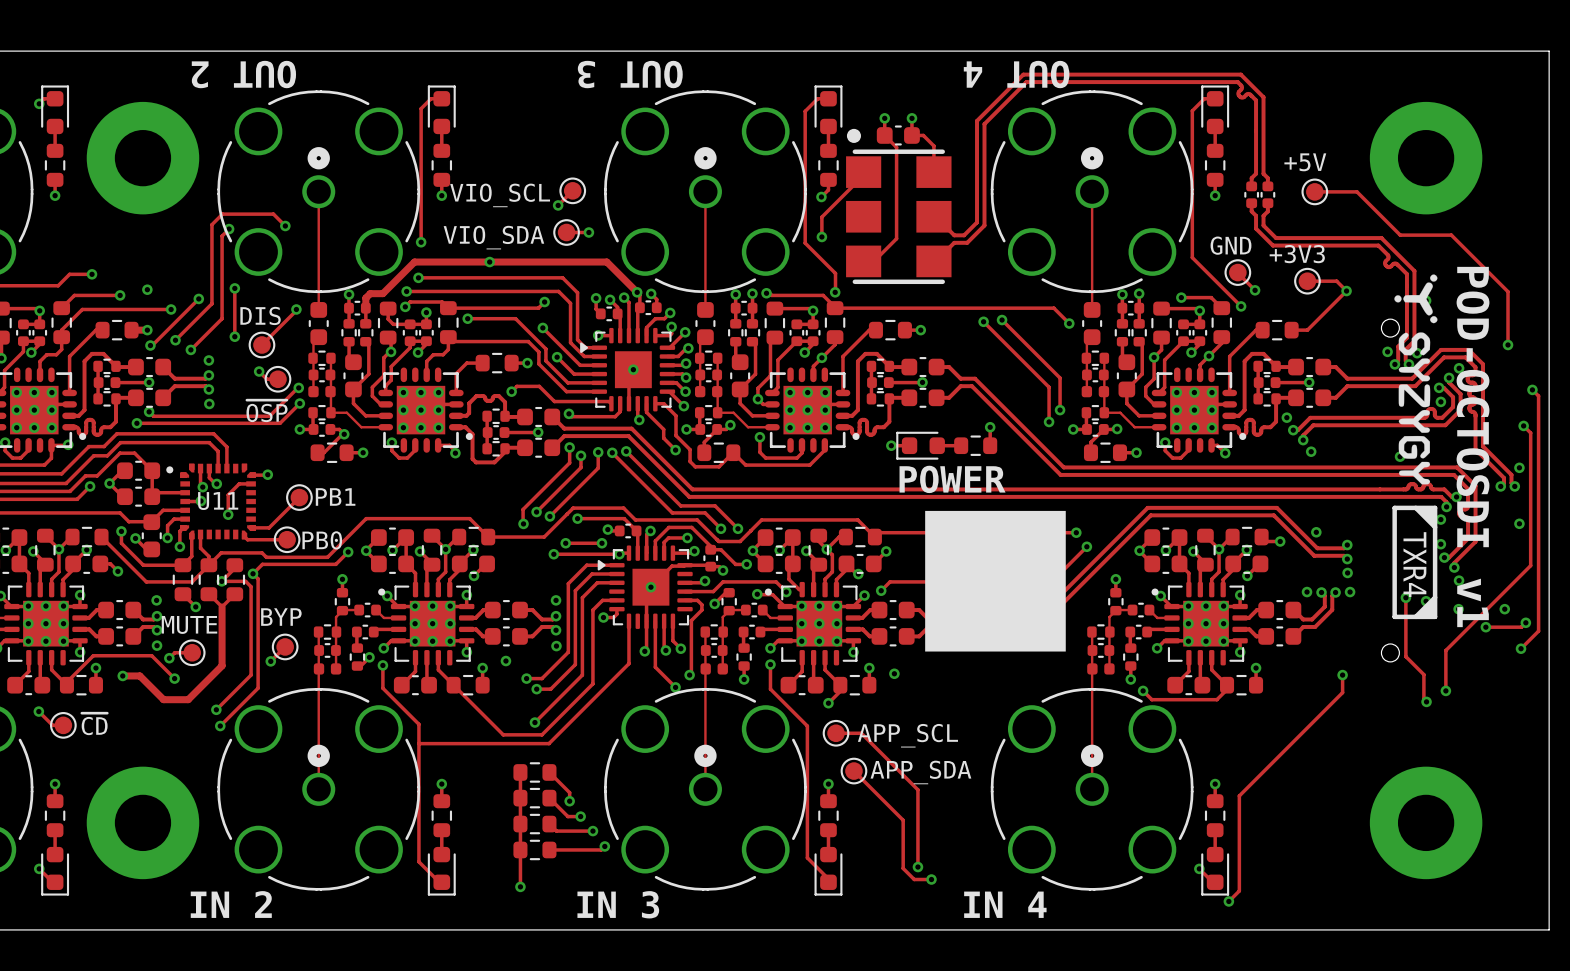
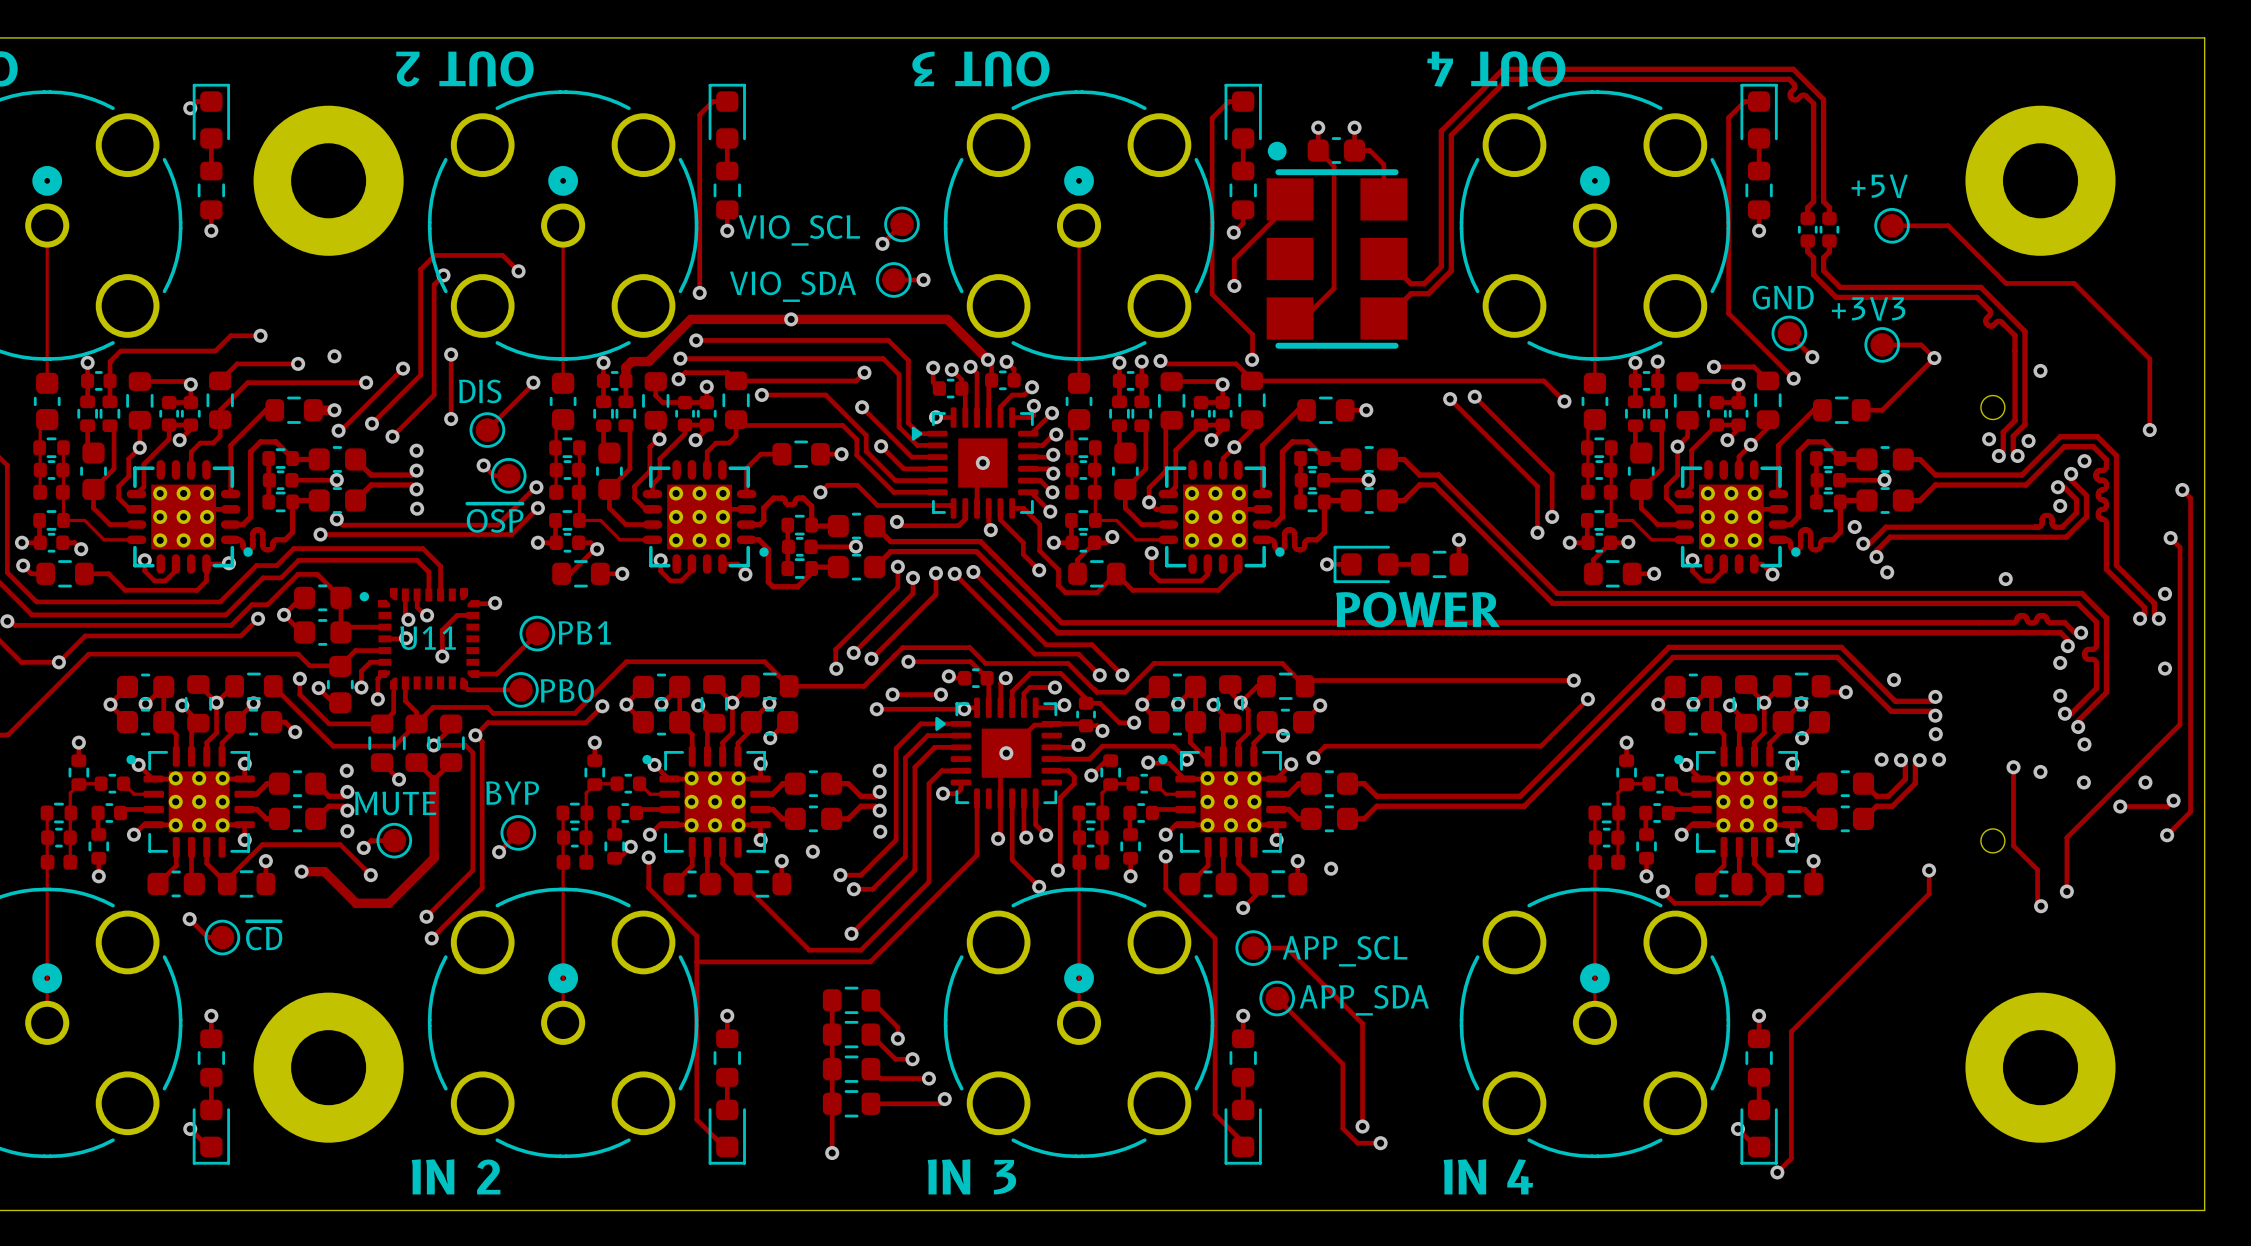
drawing: [1394, 274, 1438, 485] -> none
text: POD-OCTOSDI v1 (1473, 447) -> none
drawing: [1392, 505, 1438, 620] -> none
drawing: [925, 510, 1066, 652] -> none

